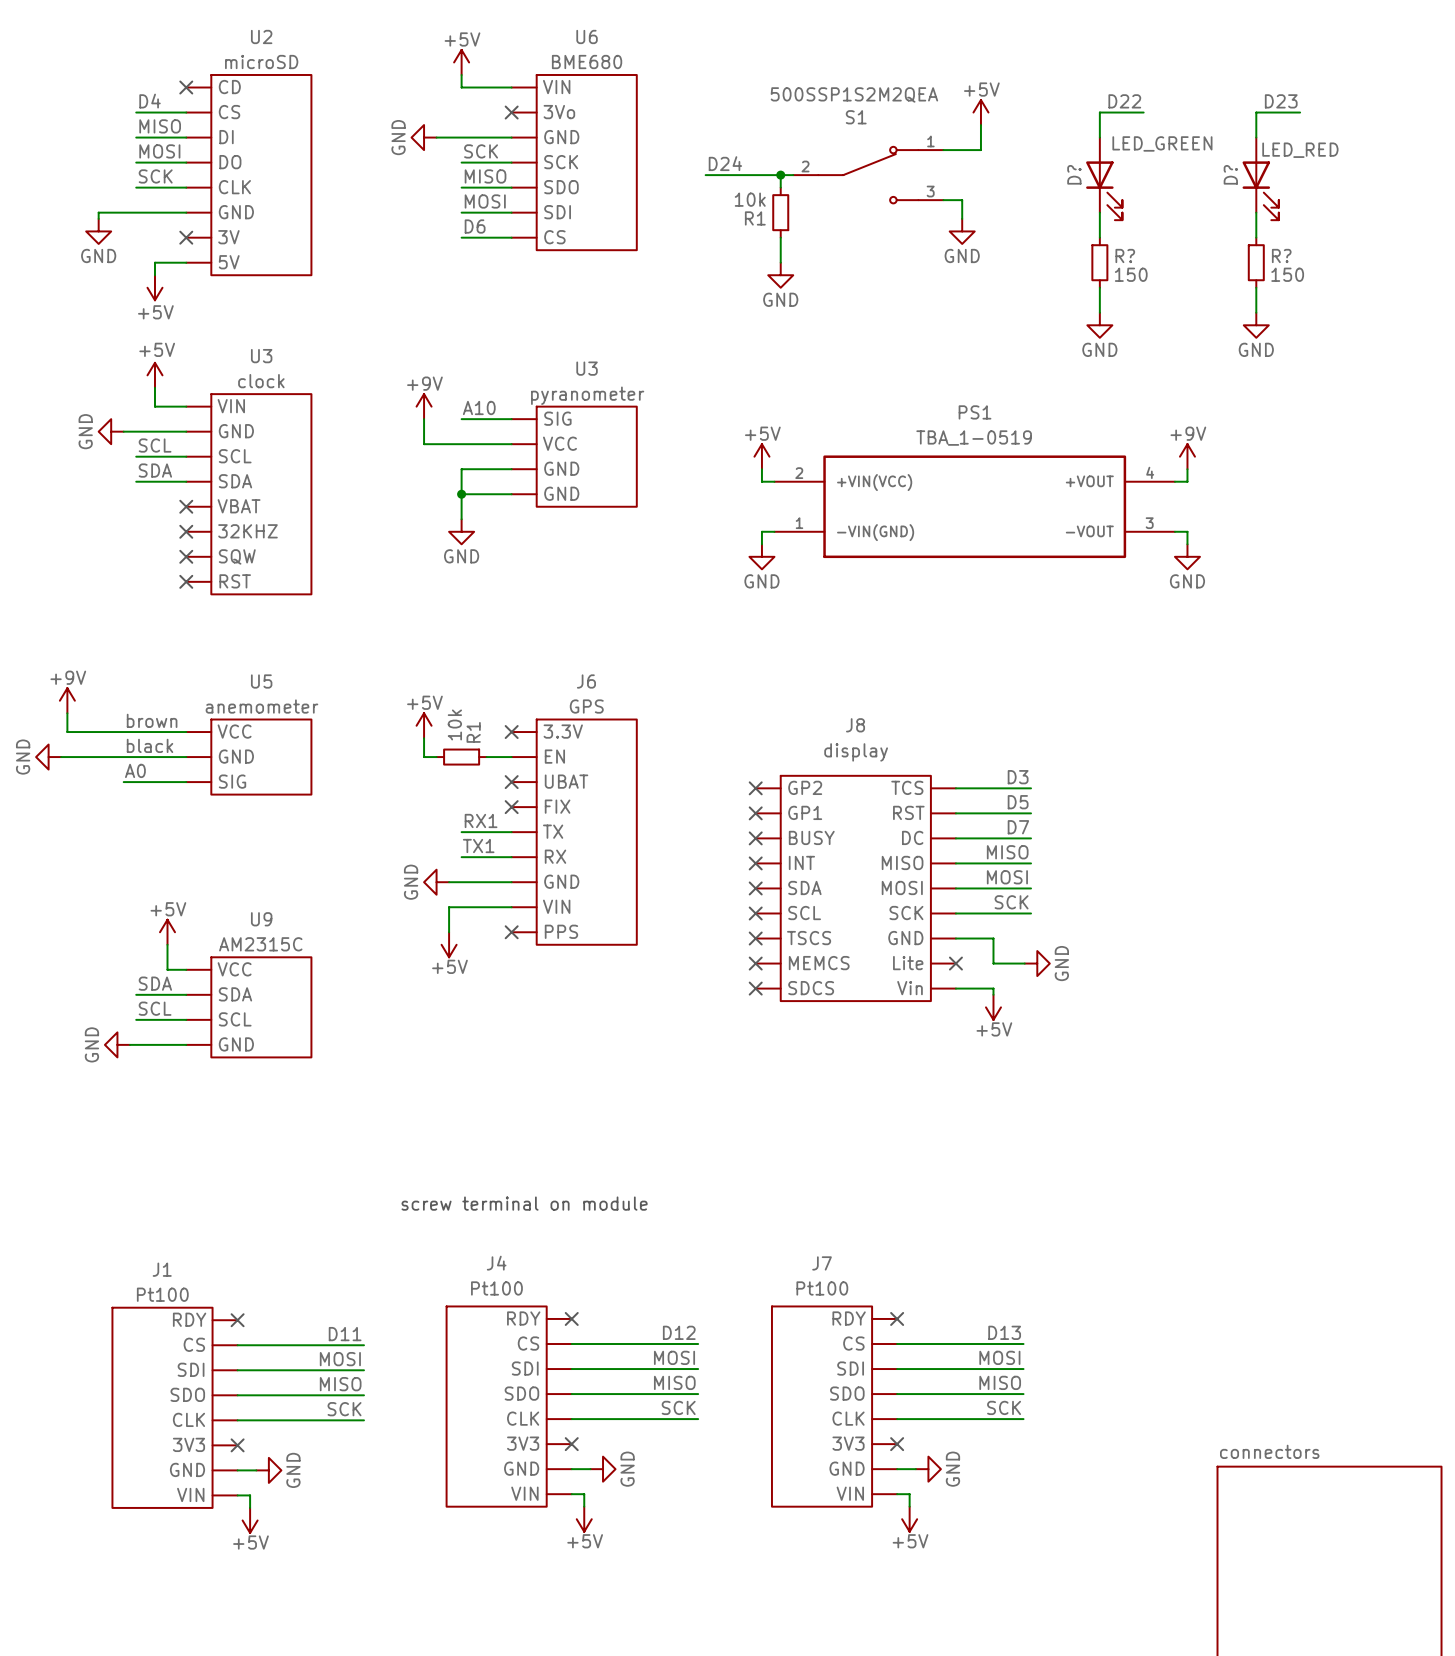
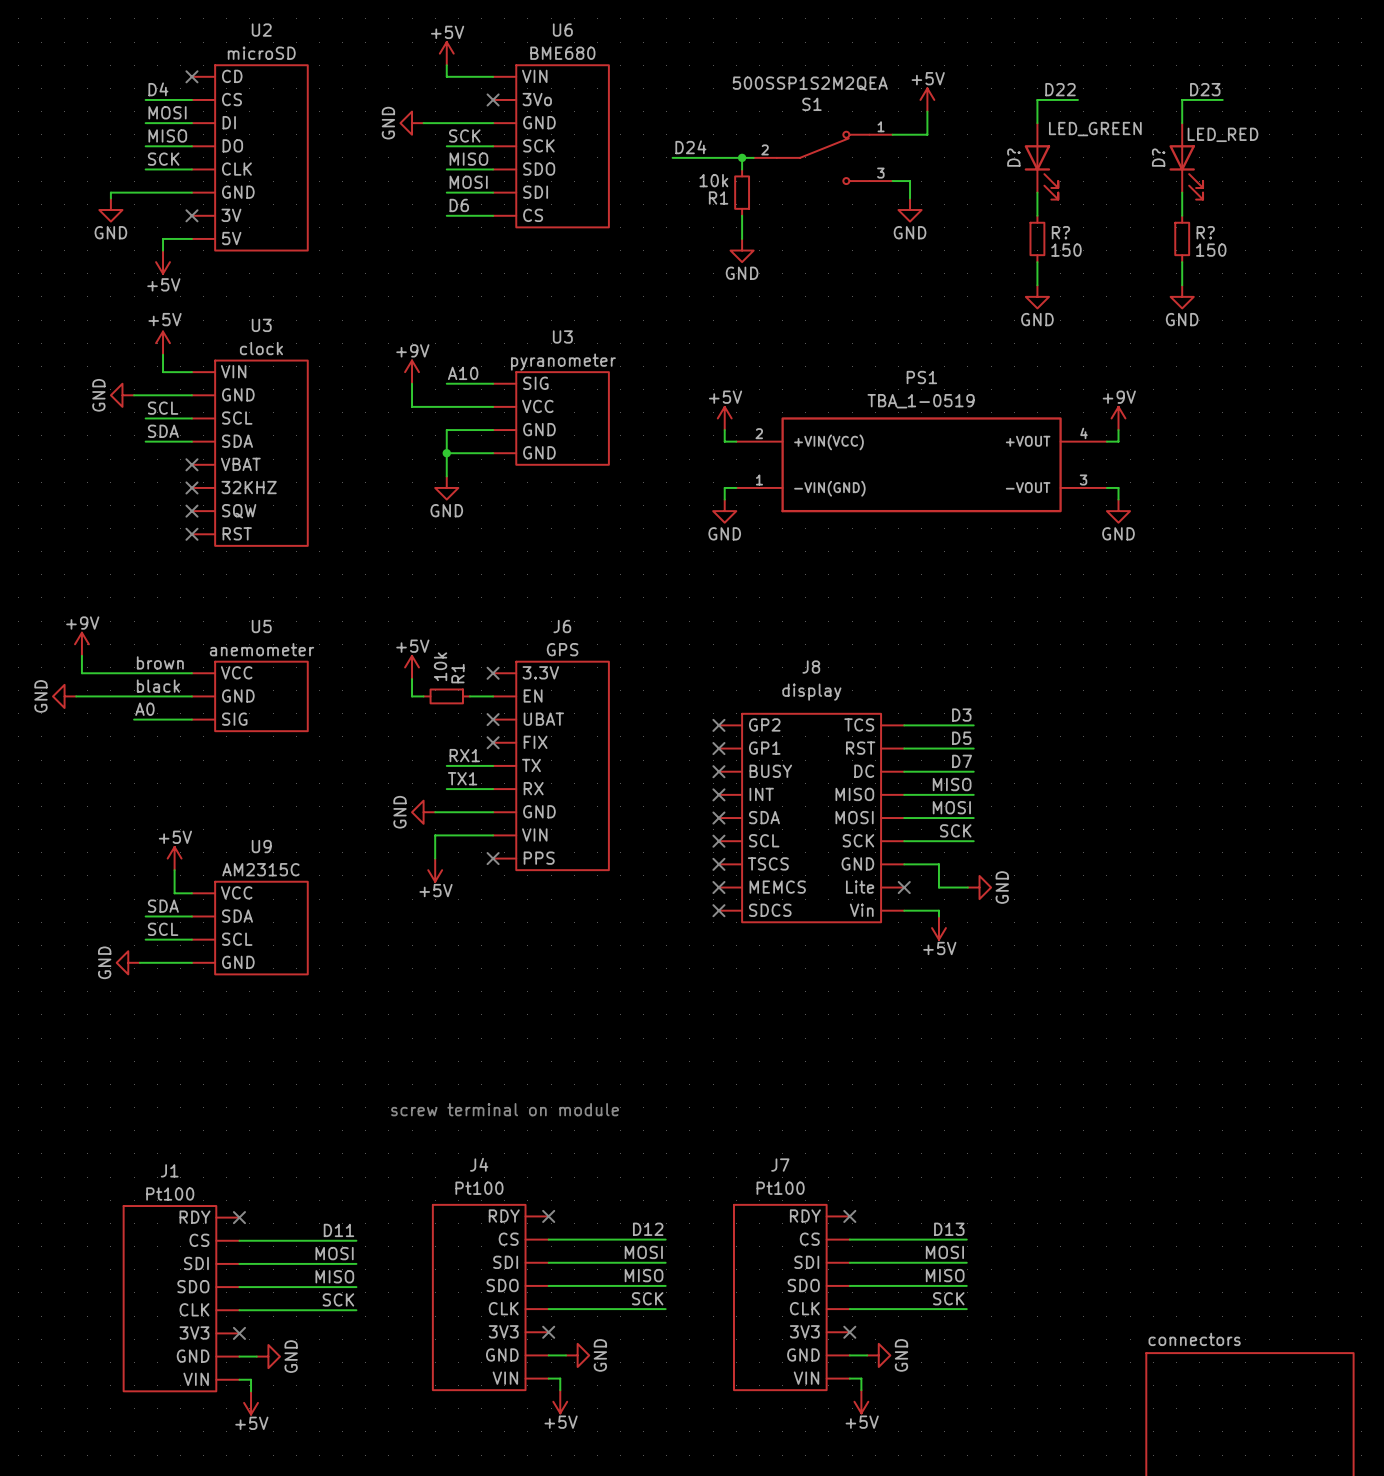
label: MISO (160, 126) -> MOSI (167, 112)
label: MOSI (159, 151) -> MISO (167, 135)

